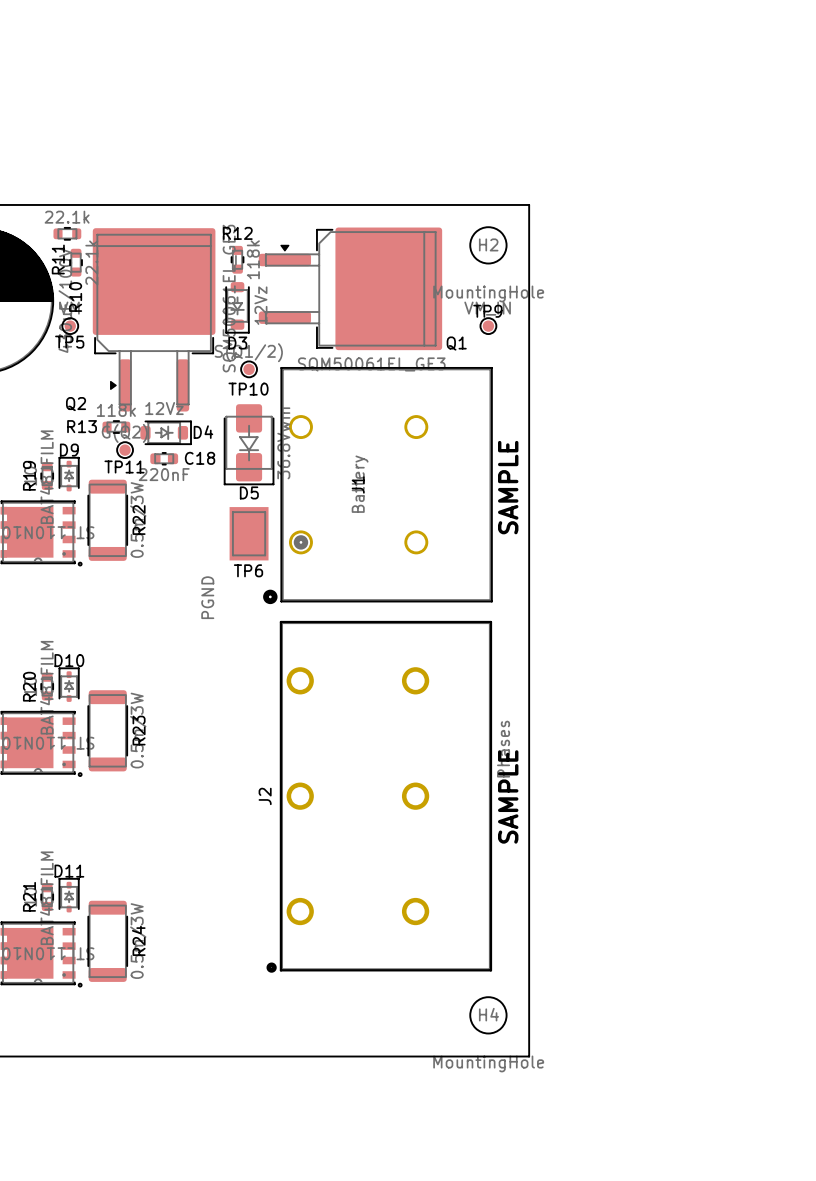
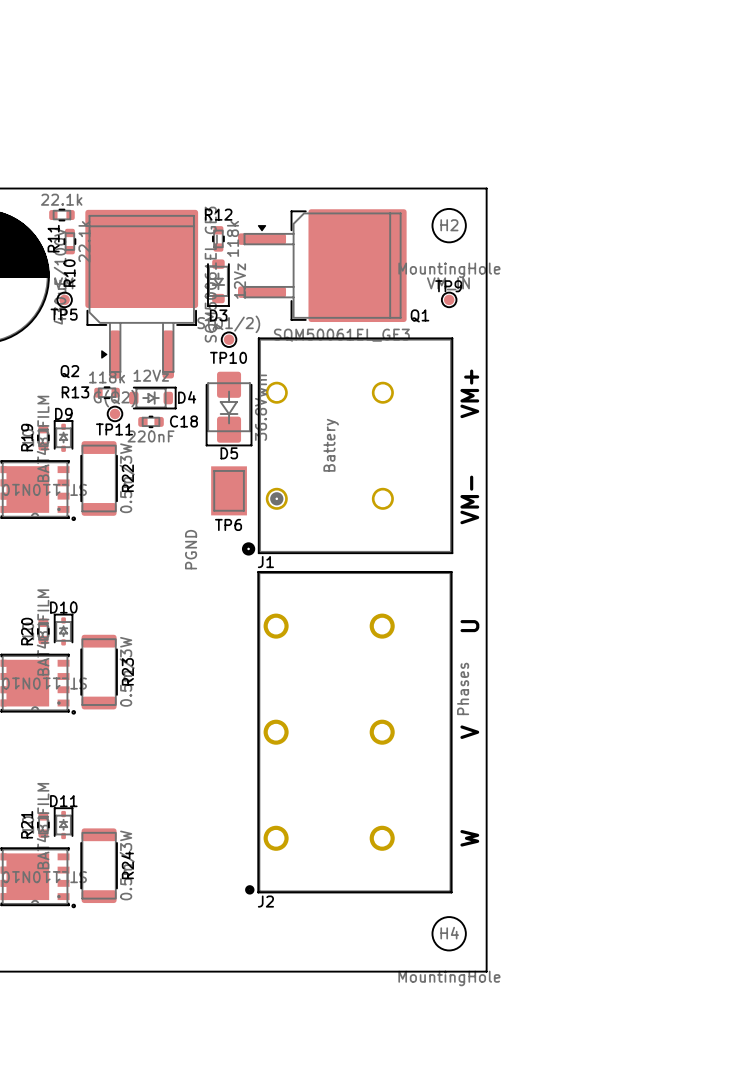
text: none -> VM+ (469, 393)
J1 name rotation: 0° (358, 484) -> 90° clockwise (265, 562)
J1 name position: J1 (358, 484) -> J1 (265, 562)
text: SAMPLE (508, 487) -> VM- (469, 499)
text: none -> U (469, 626)
J2 name rotation: 0° (265, 796) -> 90° clockwise (265, 901)
J2 name position: J2 (265, 796) -> J2 (265, 901)
text: SAMPLE (508, 796) -> none
text: none -> V (469, 732)
text: none -> W (469, 838)

